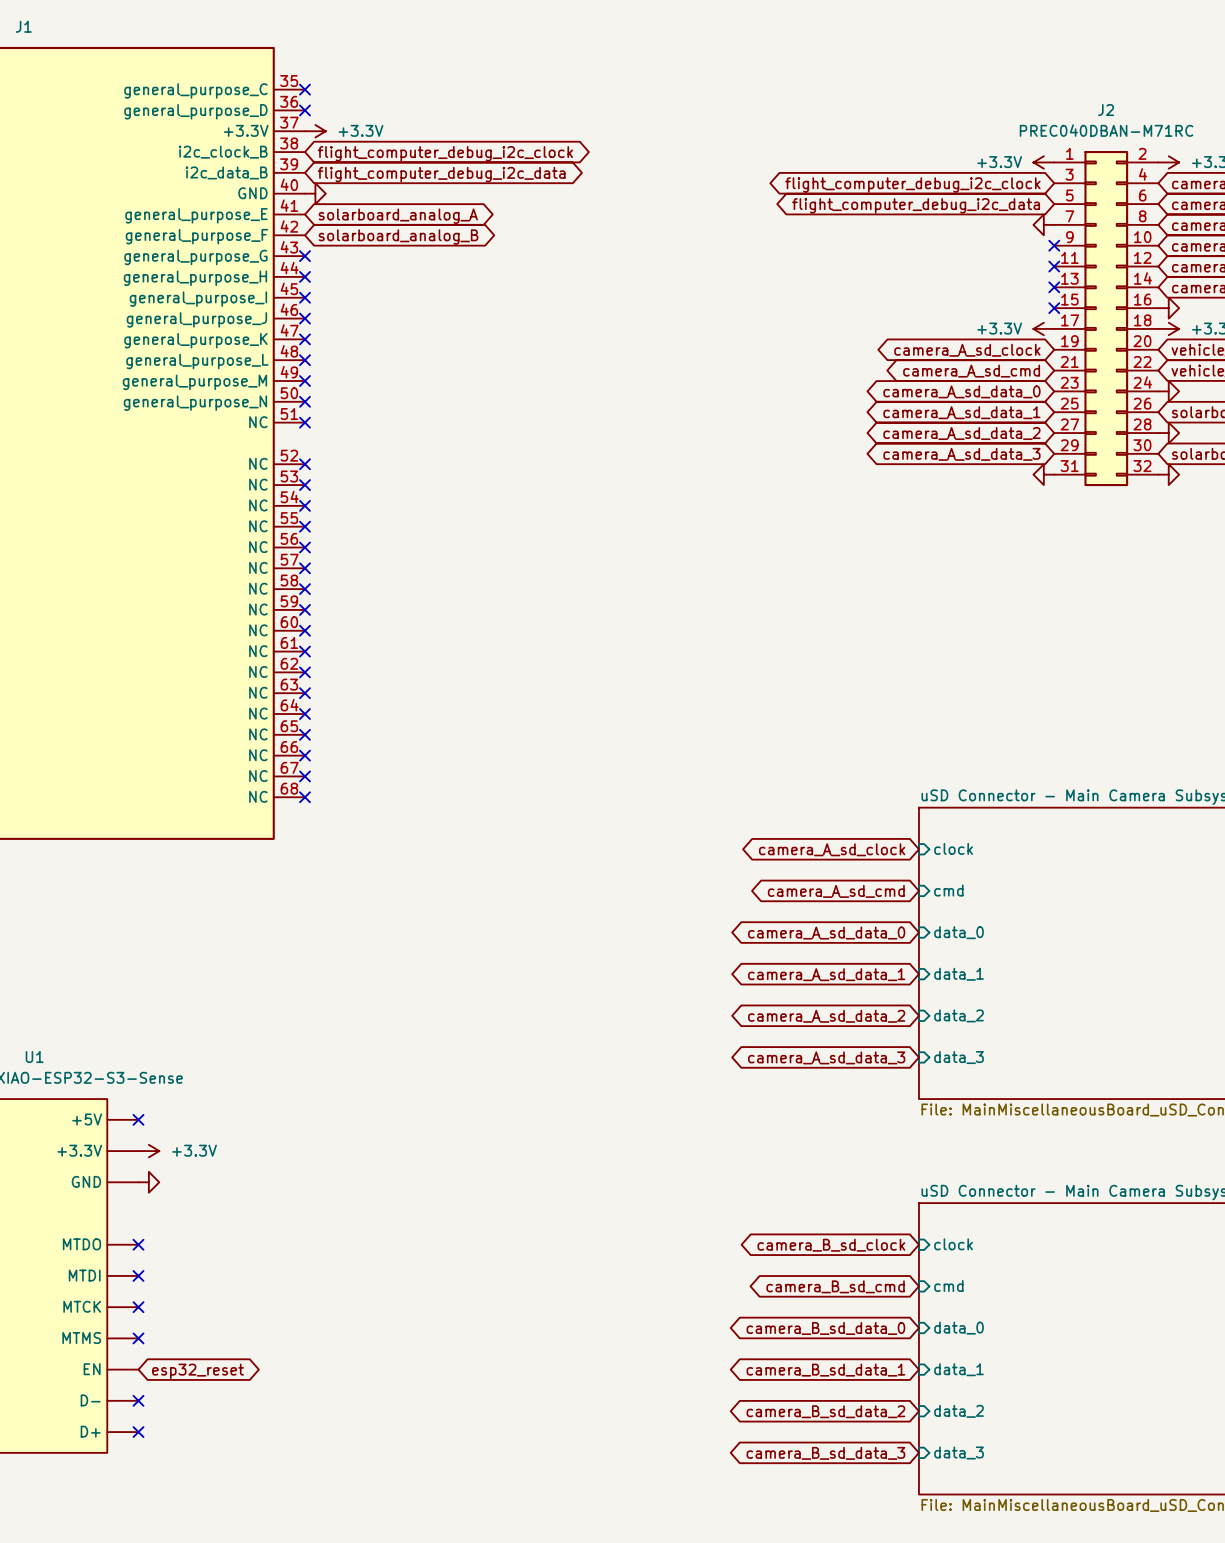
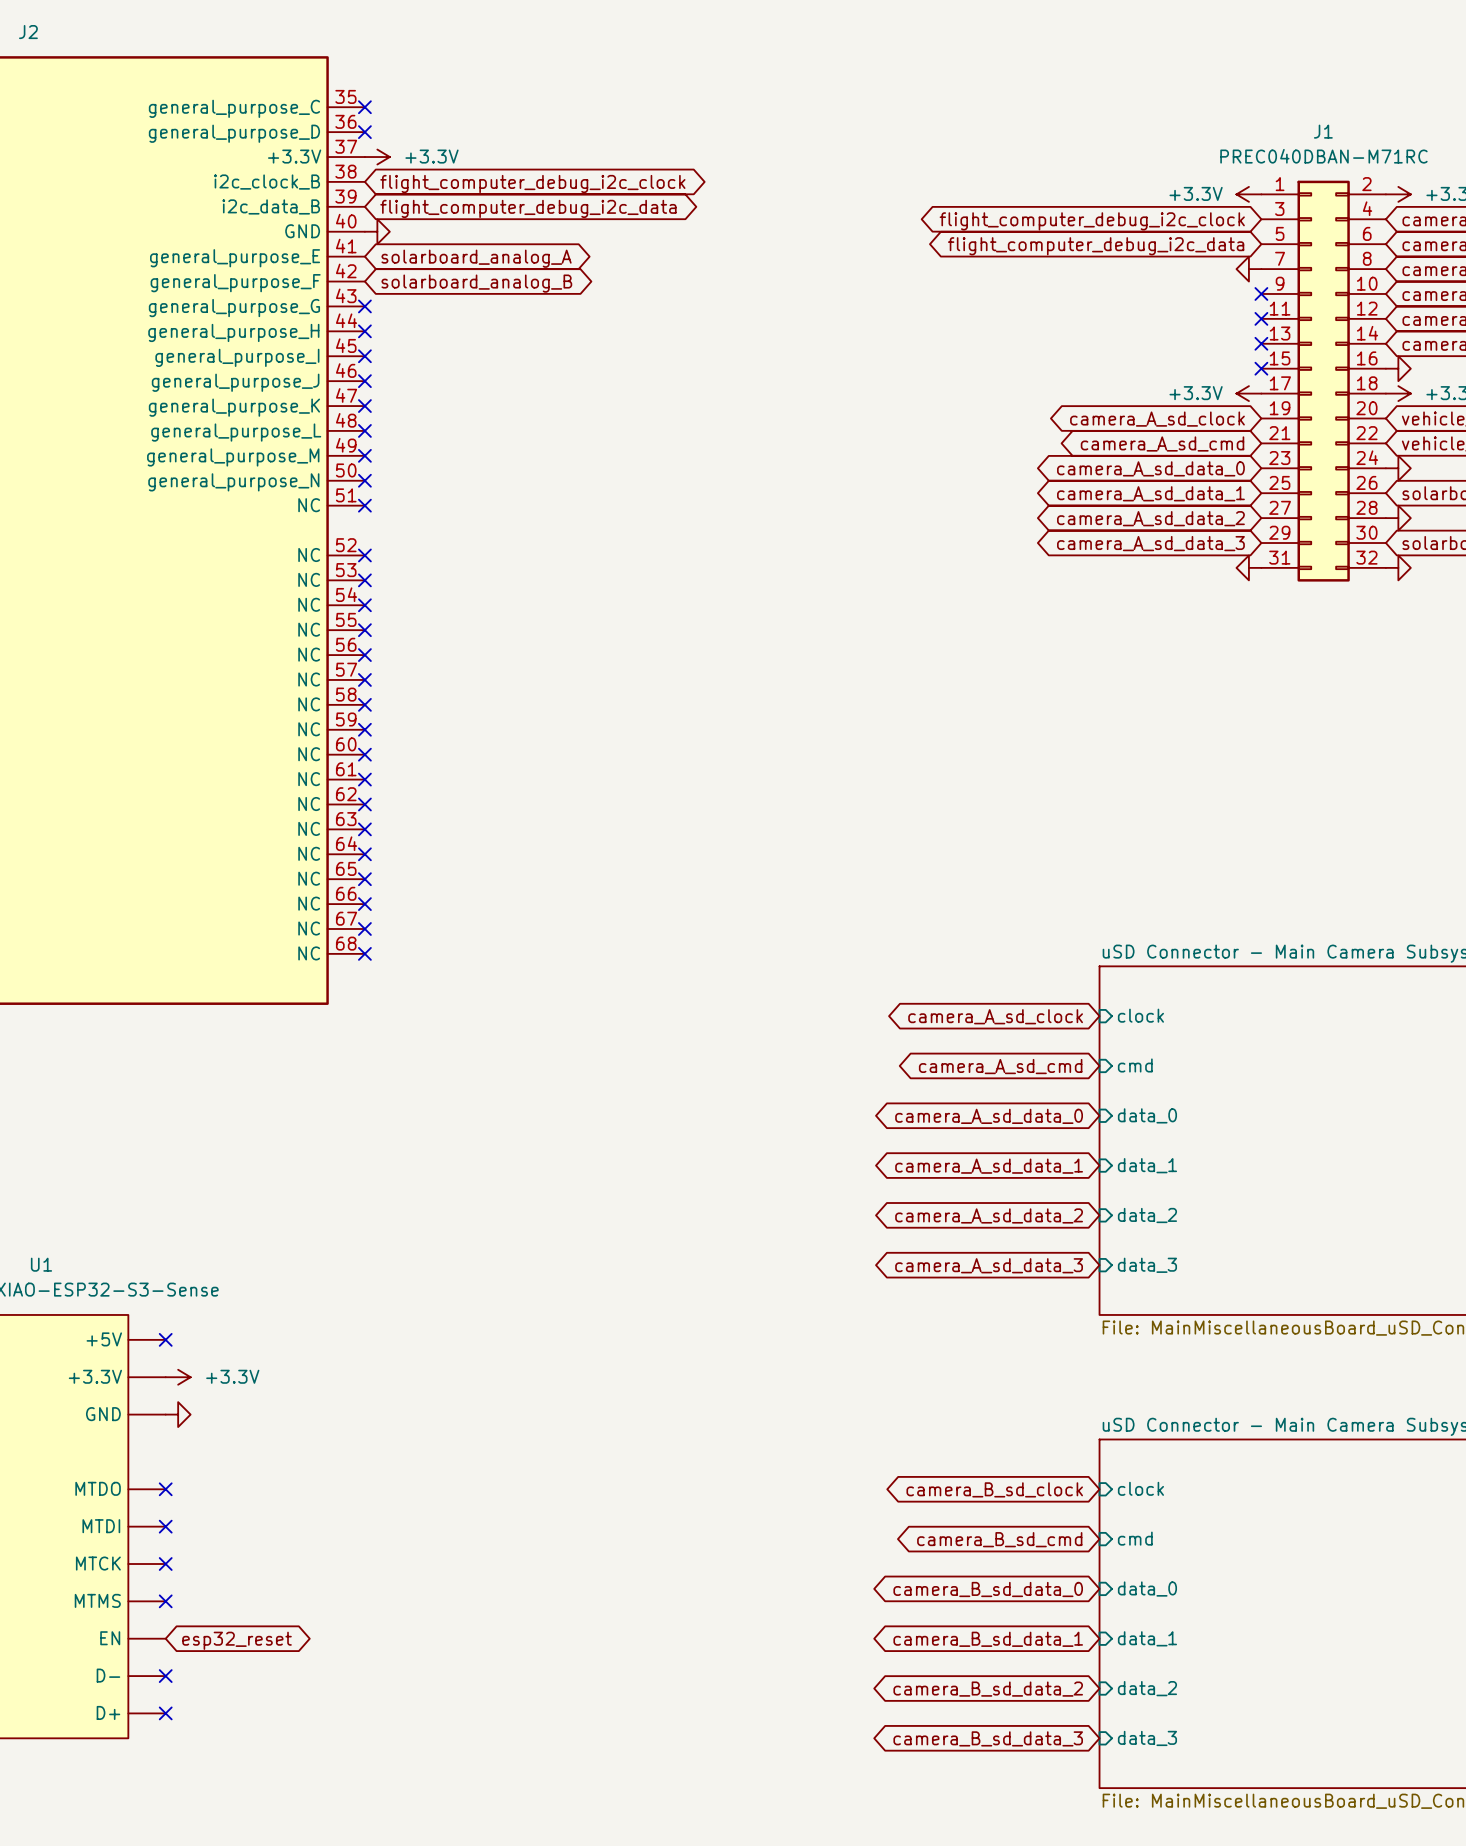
J1 name: J1 (23, 26) -> J2 (28, 32)
J2 name: J2 (1106, 110) -> J1 (1323, 131)

